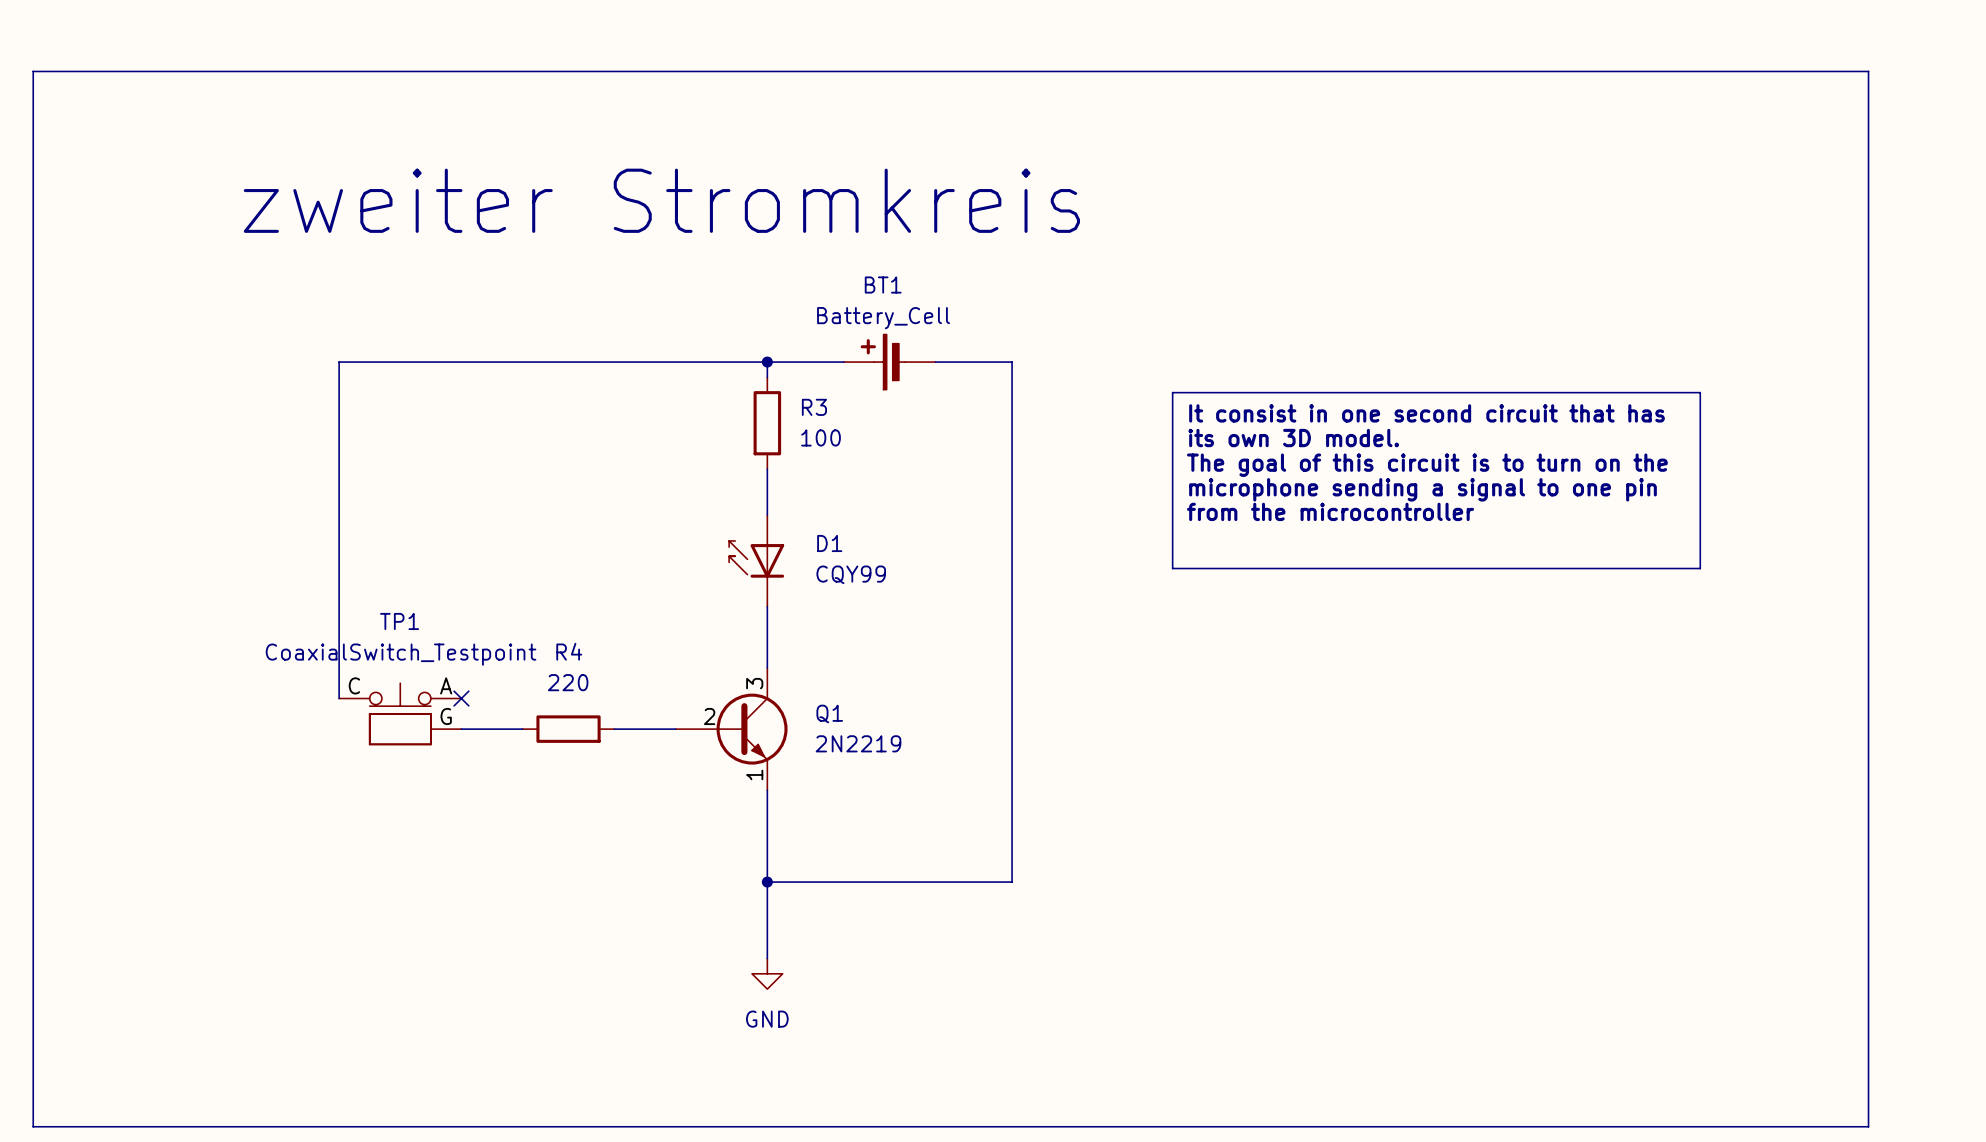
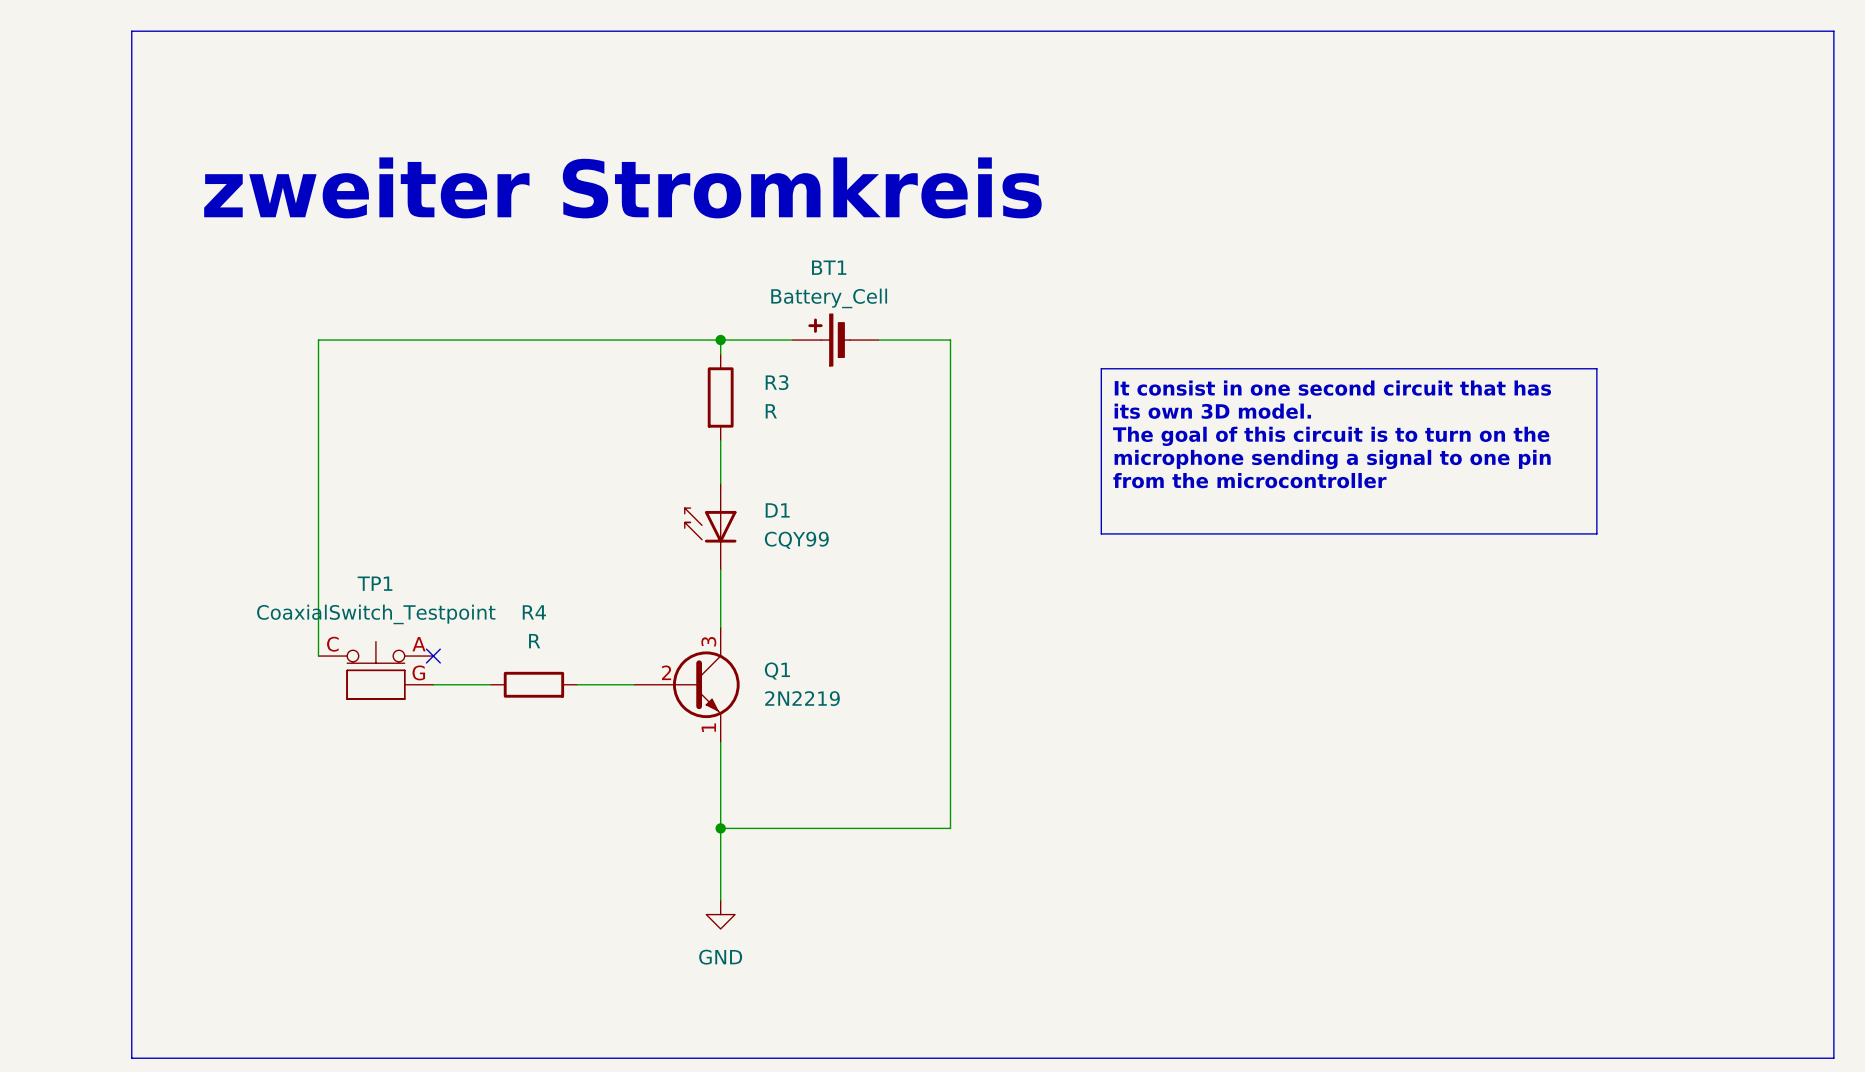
R3 name position: R3 (814, 407) -> R3 (777, 382)
R3 value: 100 (820, 437) -> R (771, 411)
R4 value: 220 (568, 682) -> R (534, 641)
line: (140, 1126) (33, 1126) (33, 71) (1868, 71) (1868, 1126) -> (131, 1058) (131, 31) (1833, 31) (1833, 1058) (1754, 1058)

